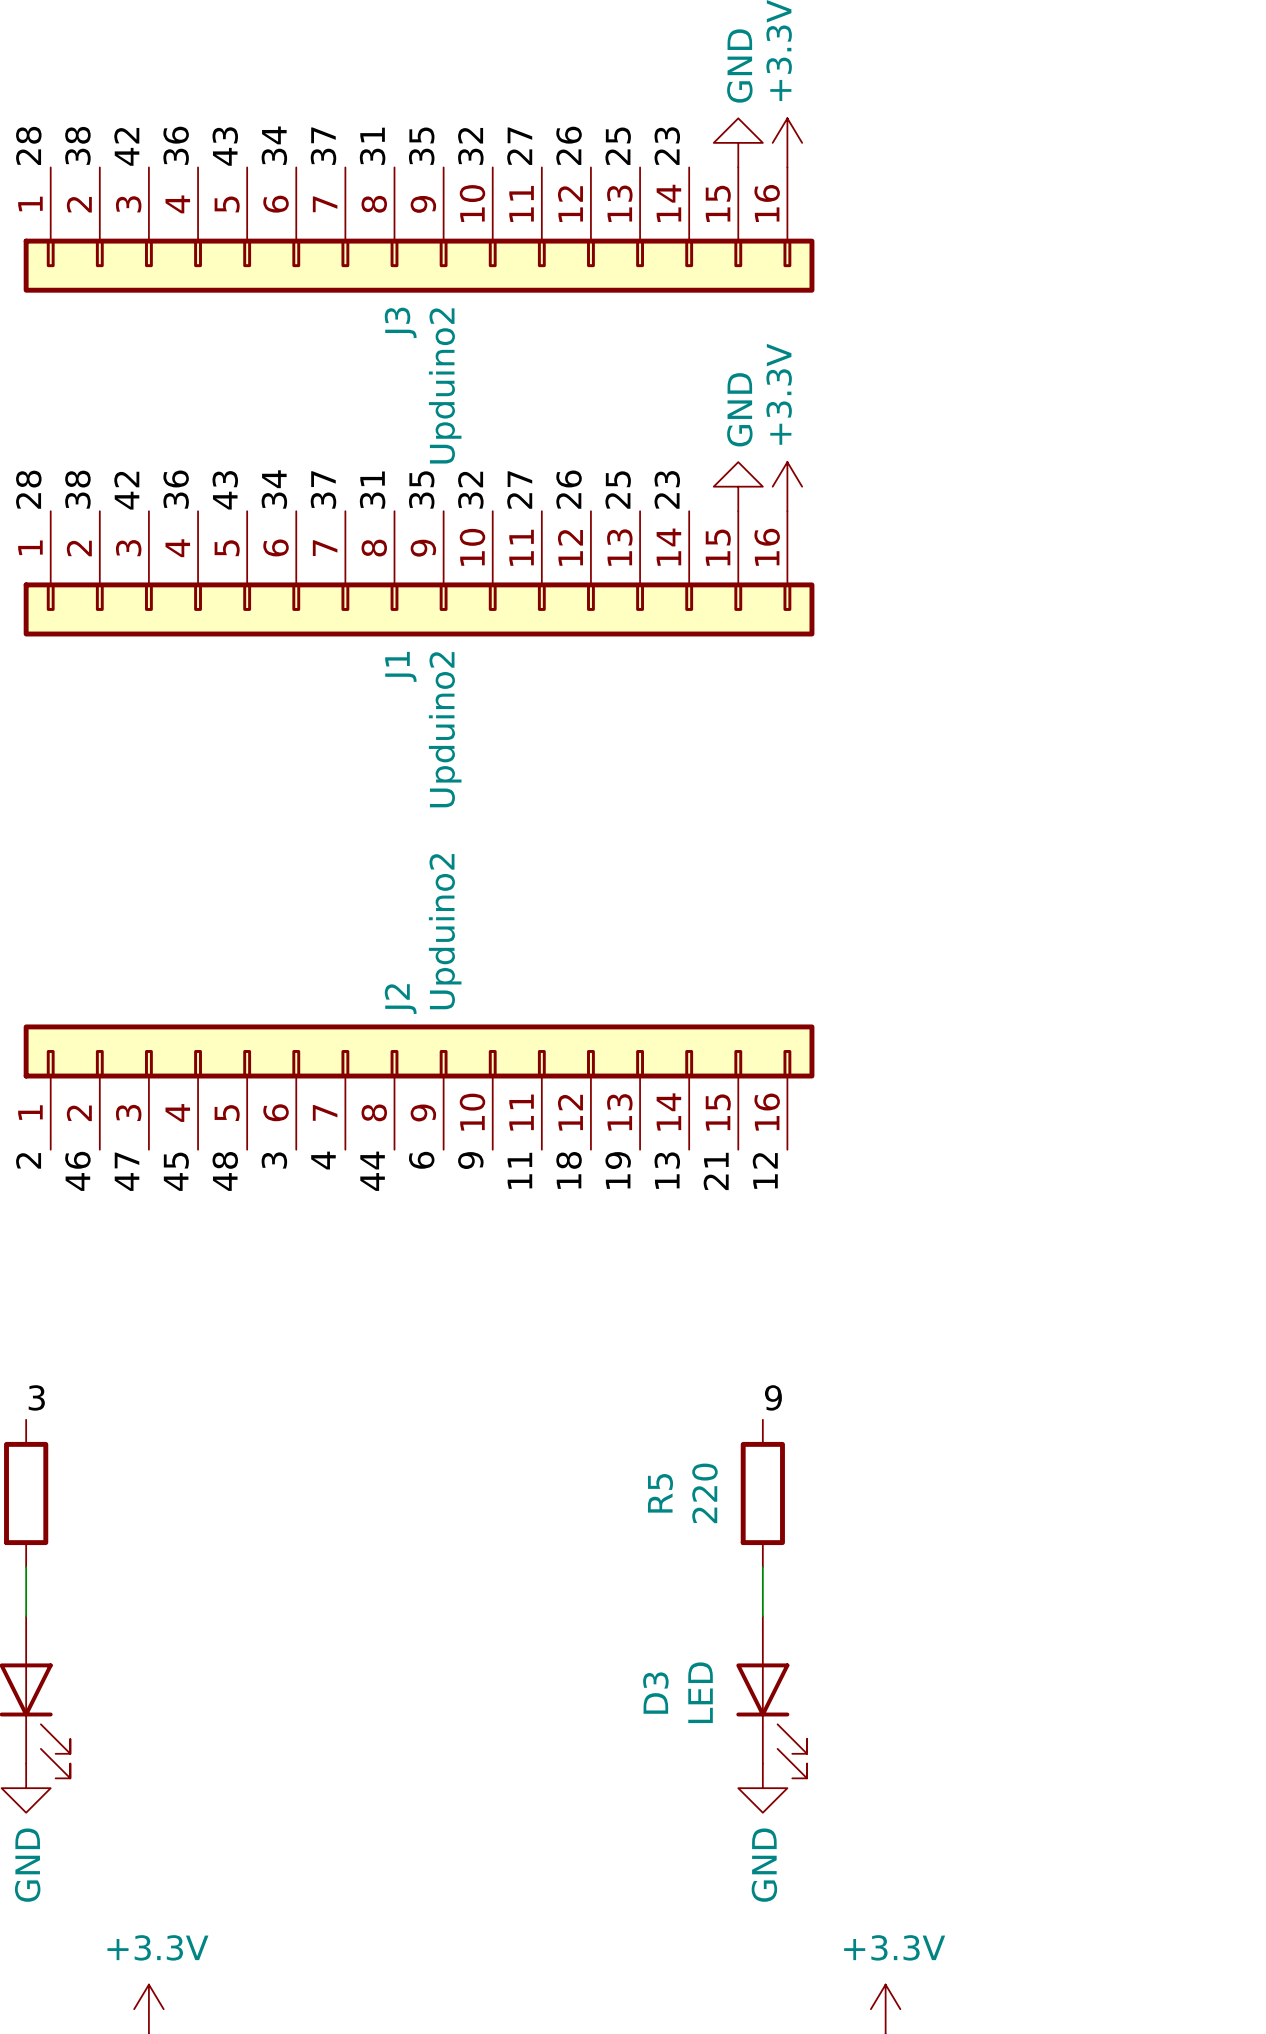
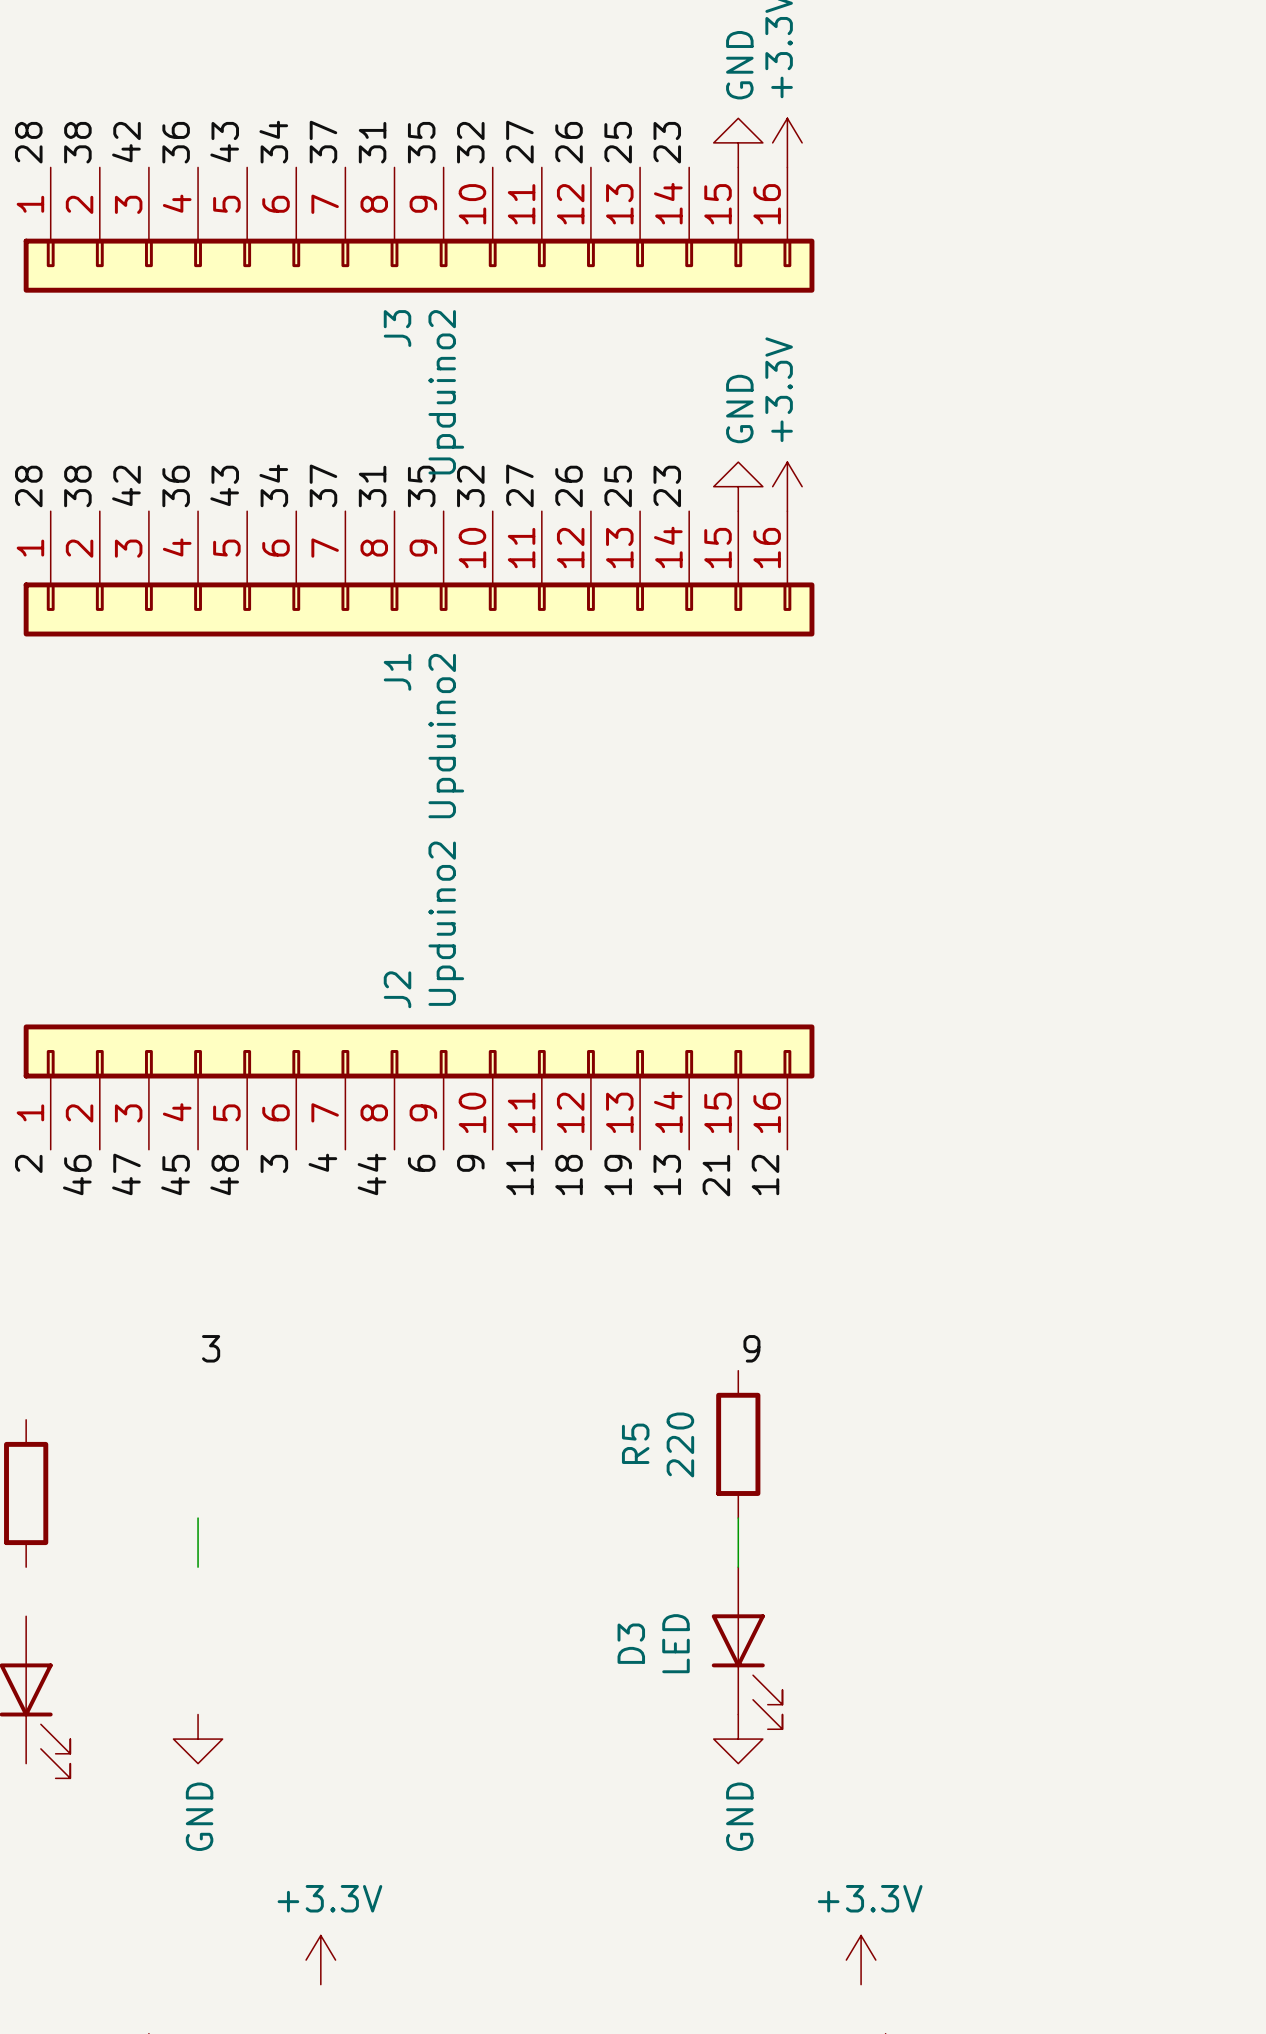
label position: 3 (36, 1397) -> 3 (211, 1348)
label position: 9 (773, 1397) -> 9 (751, 1348)
R5 position: (762, 1493) -> (738, 1444)
wire: (26, 1567) (26, 1616) -> (198, 1518) (198, 1567)
wire: (762, 1567) (762, 1616) -> (738, 1518) (738, 1567)
D3 position: (771, 1697) -> (747, 1648)
power symbol position: GND (26, 1788) -> GND (198, 1739)
power symbol position: GND (762, 1788) -> GND (738, 1739)
power symbol position: +3.3V (148, 2009) -> +3.3V (320, 1960)
power symbol position: +3.3V (885, 2009) -> +3.3V (861, 1960)

